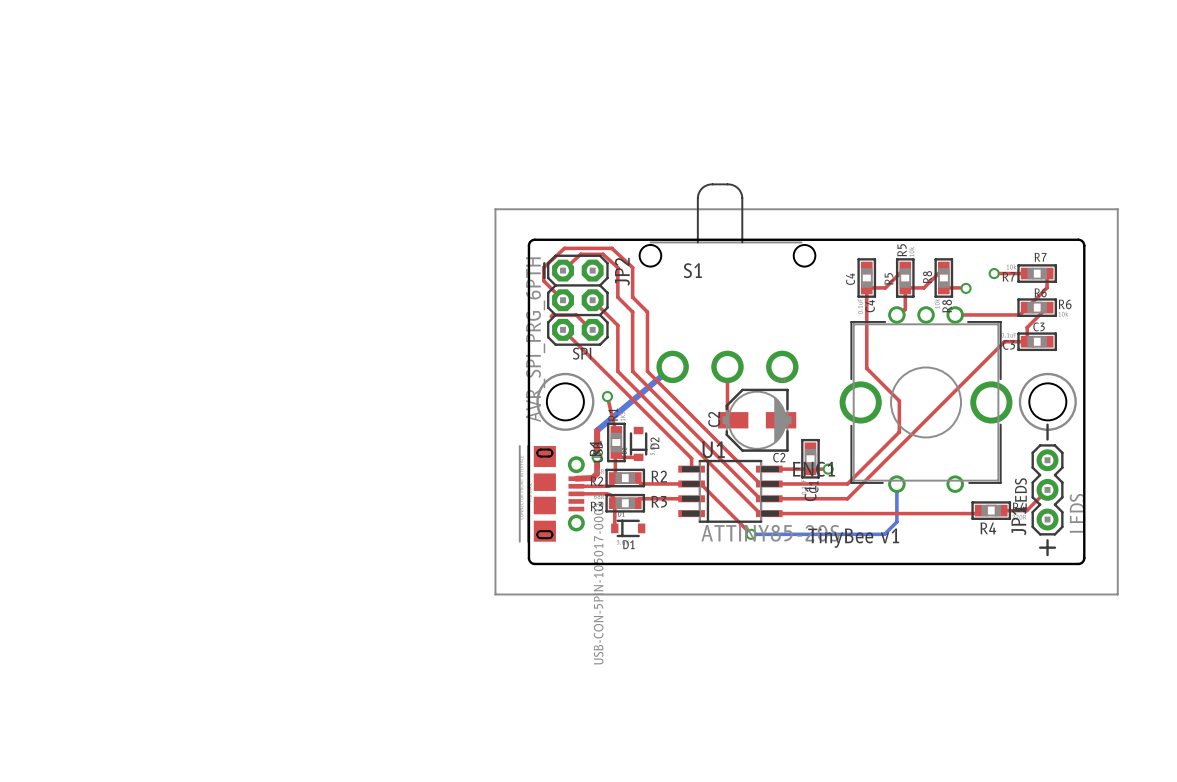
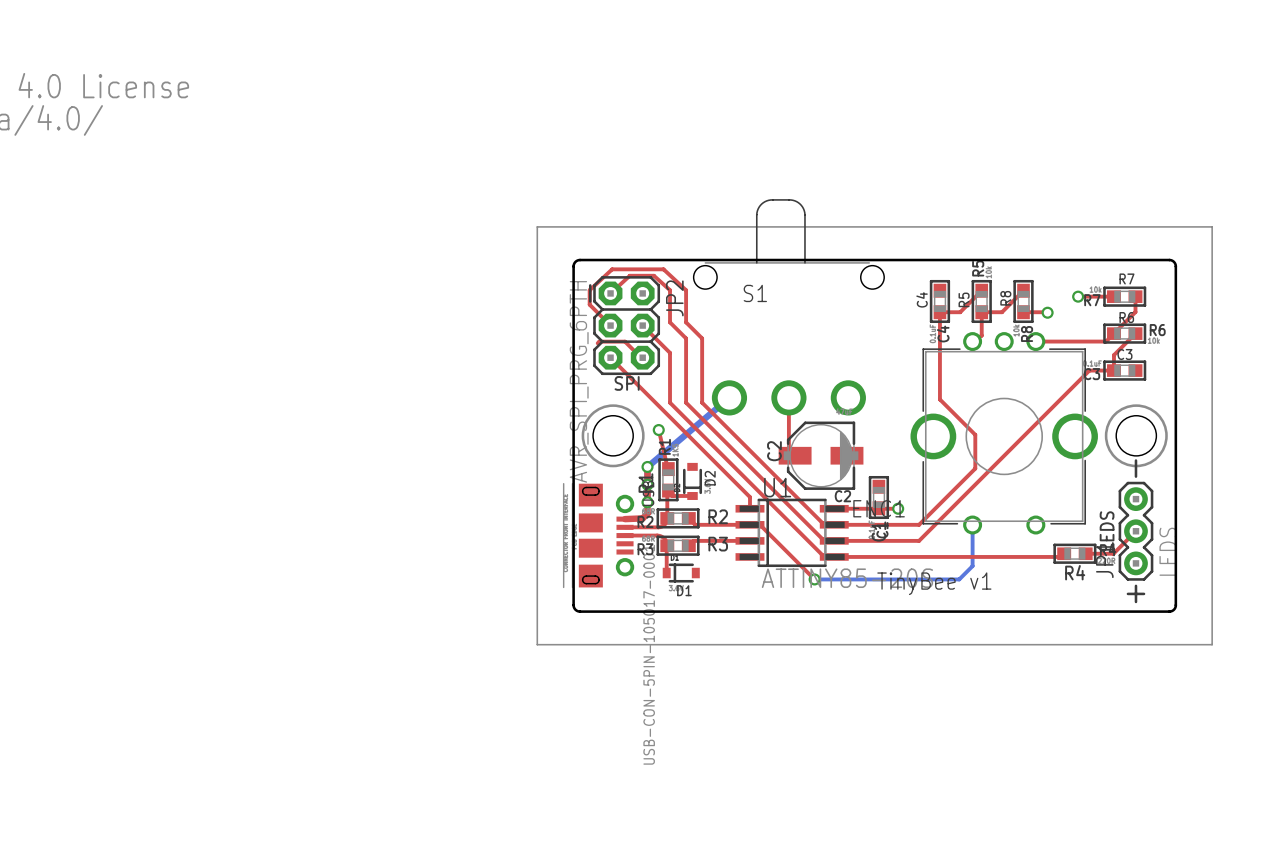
via: none -> (647, 466)
via: none -> (647, 484)
via: (597, 457) -> none
via: none -> (647, 502)

